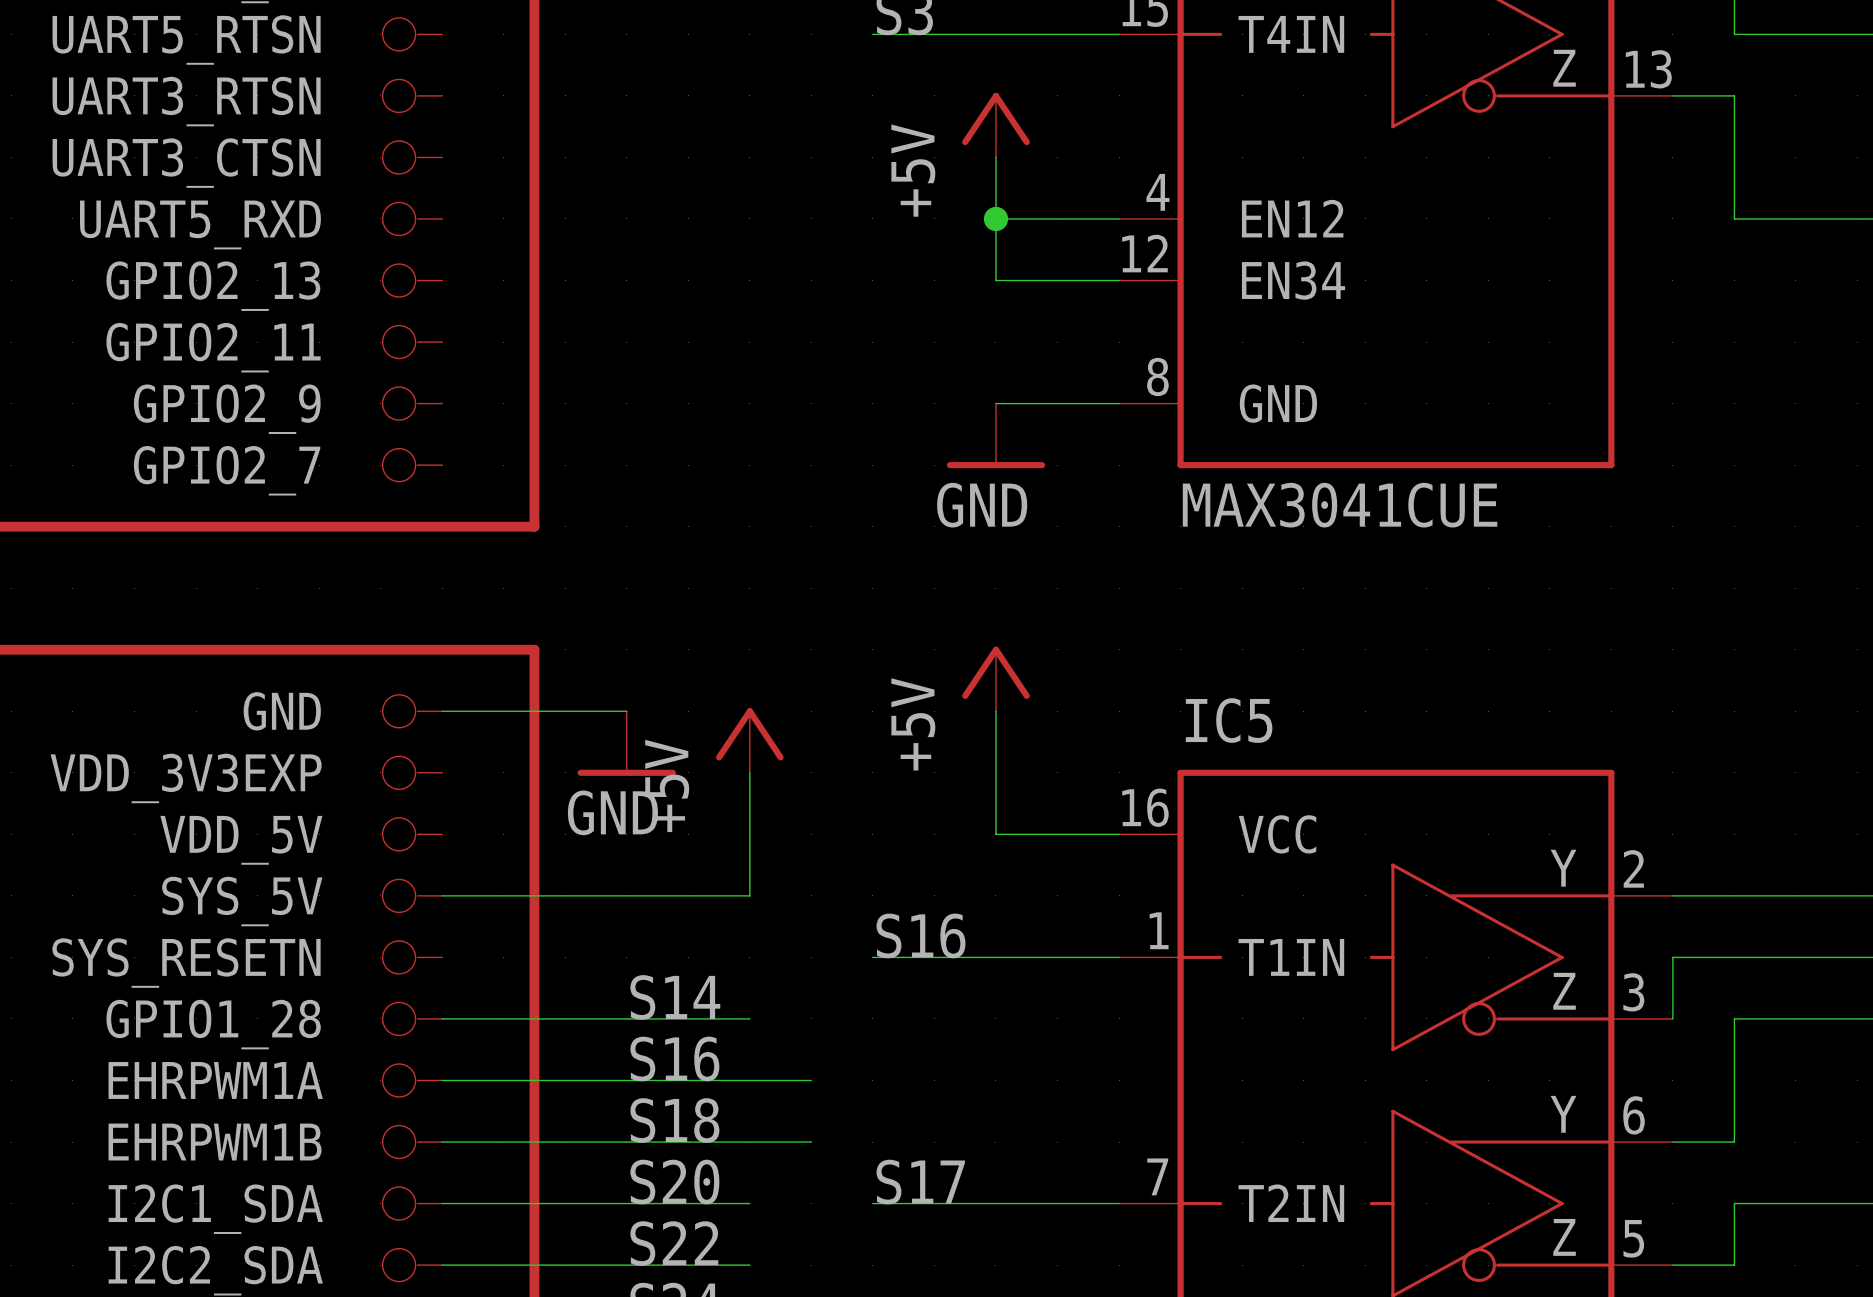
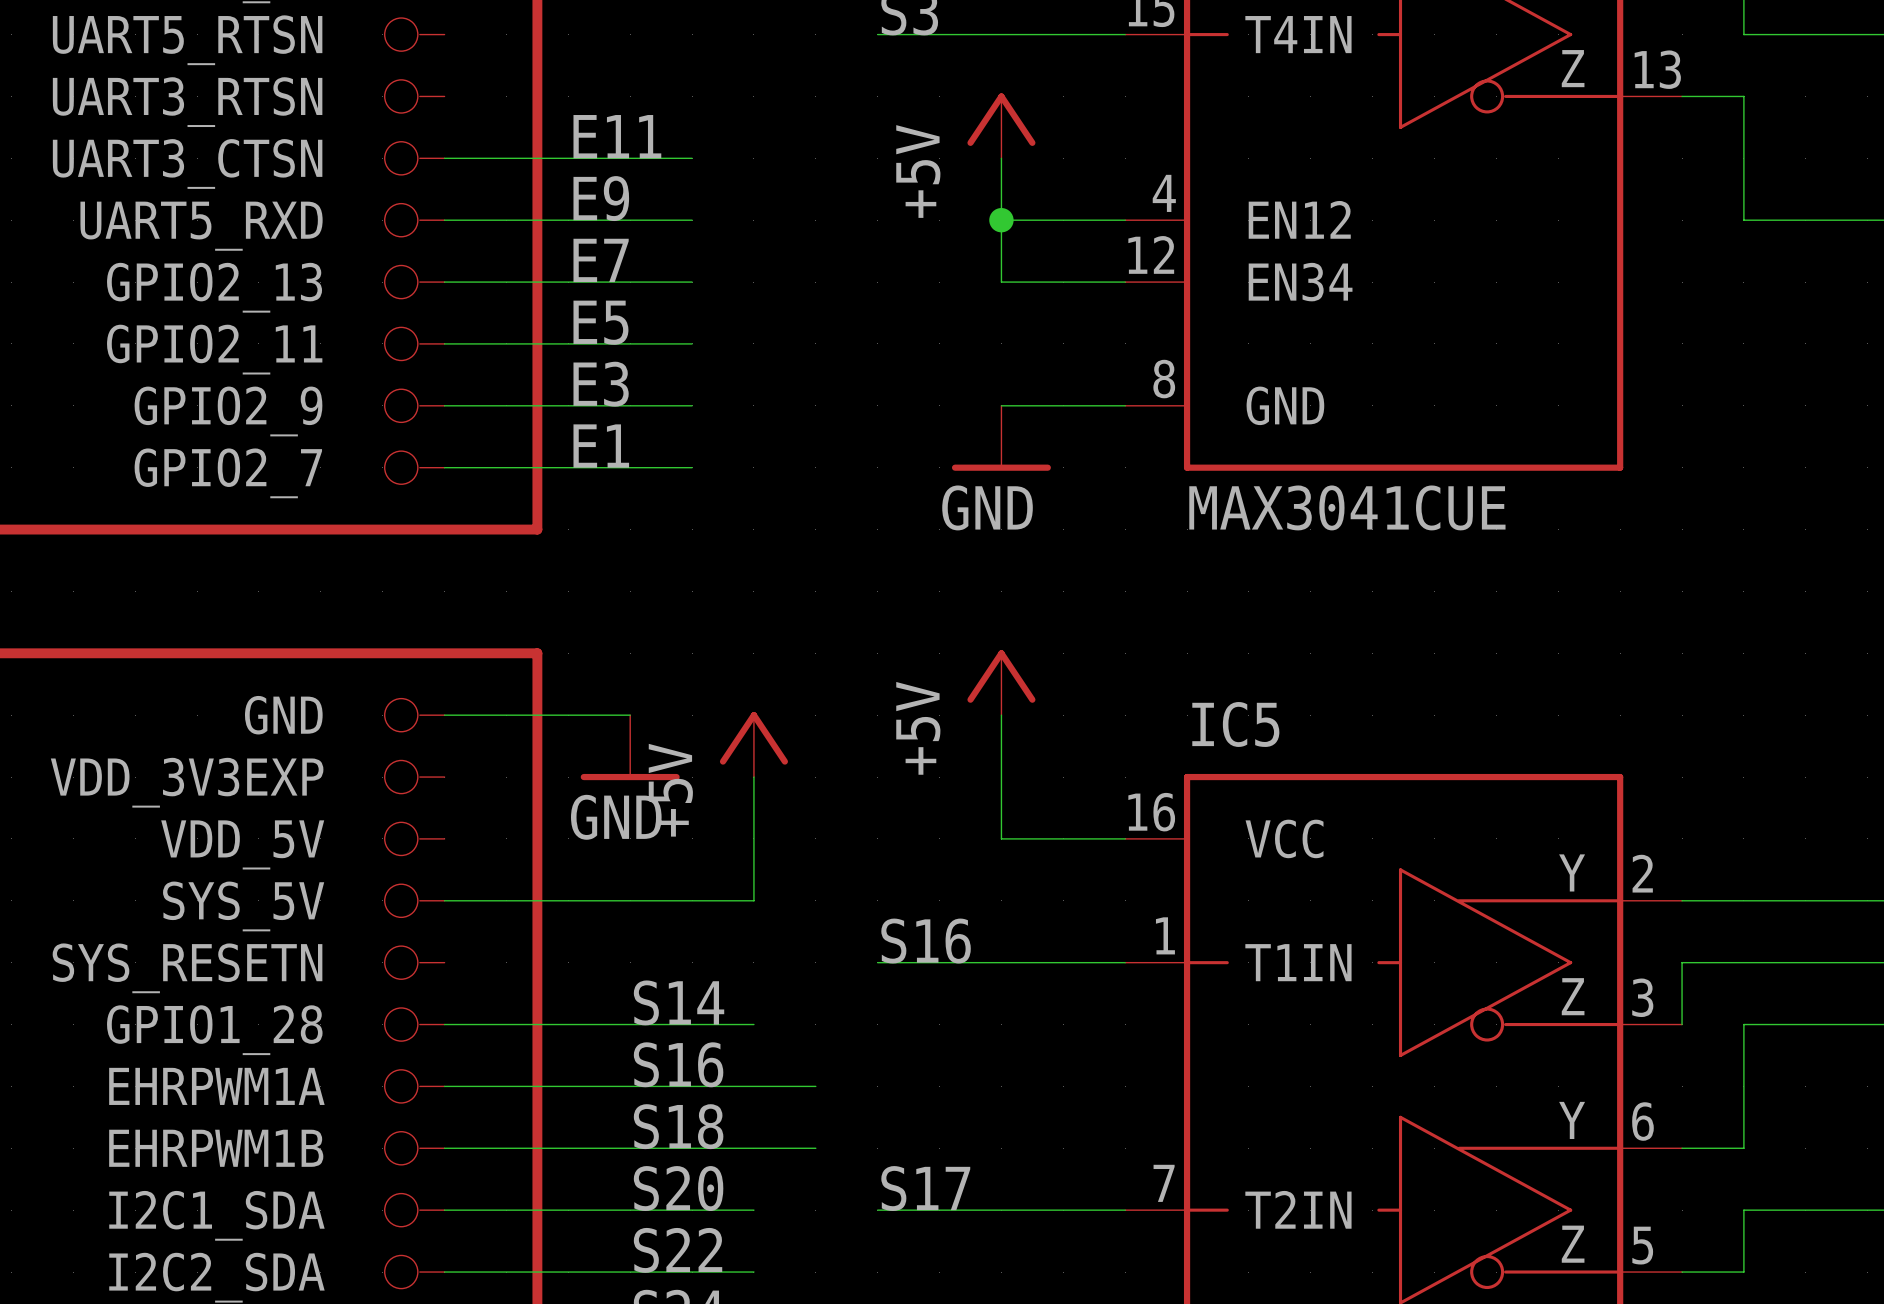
label: none -> E11 (617, 136)
wire: none -> (444, 158) (692, 158)
label: none -> E9 (601, 198)
wire: none -> (444, 220) (692, 220)
label: none -> E7 (601, 260)
wire: none -> (444, 282) (692, 282)
label: none -> E5 (600, 322)
wire: none -> (444, 343) (692, 343)
label: none -> E3 (601, 384)
wire: none -> (444, 405) (692, 405)
label: none -> E1 (601, 446)
wire: none -> (444, 467) (692, 467)

